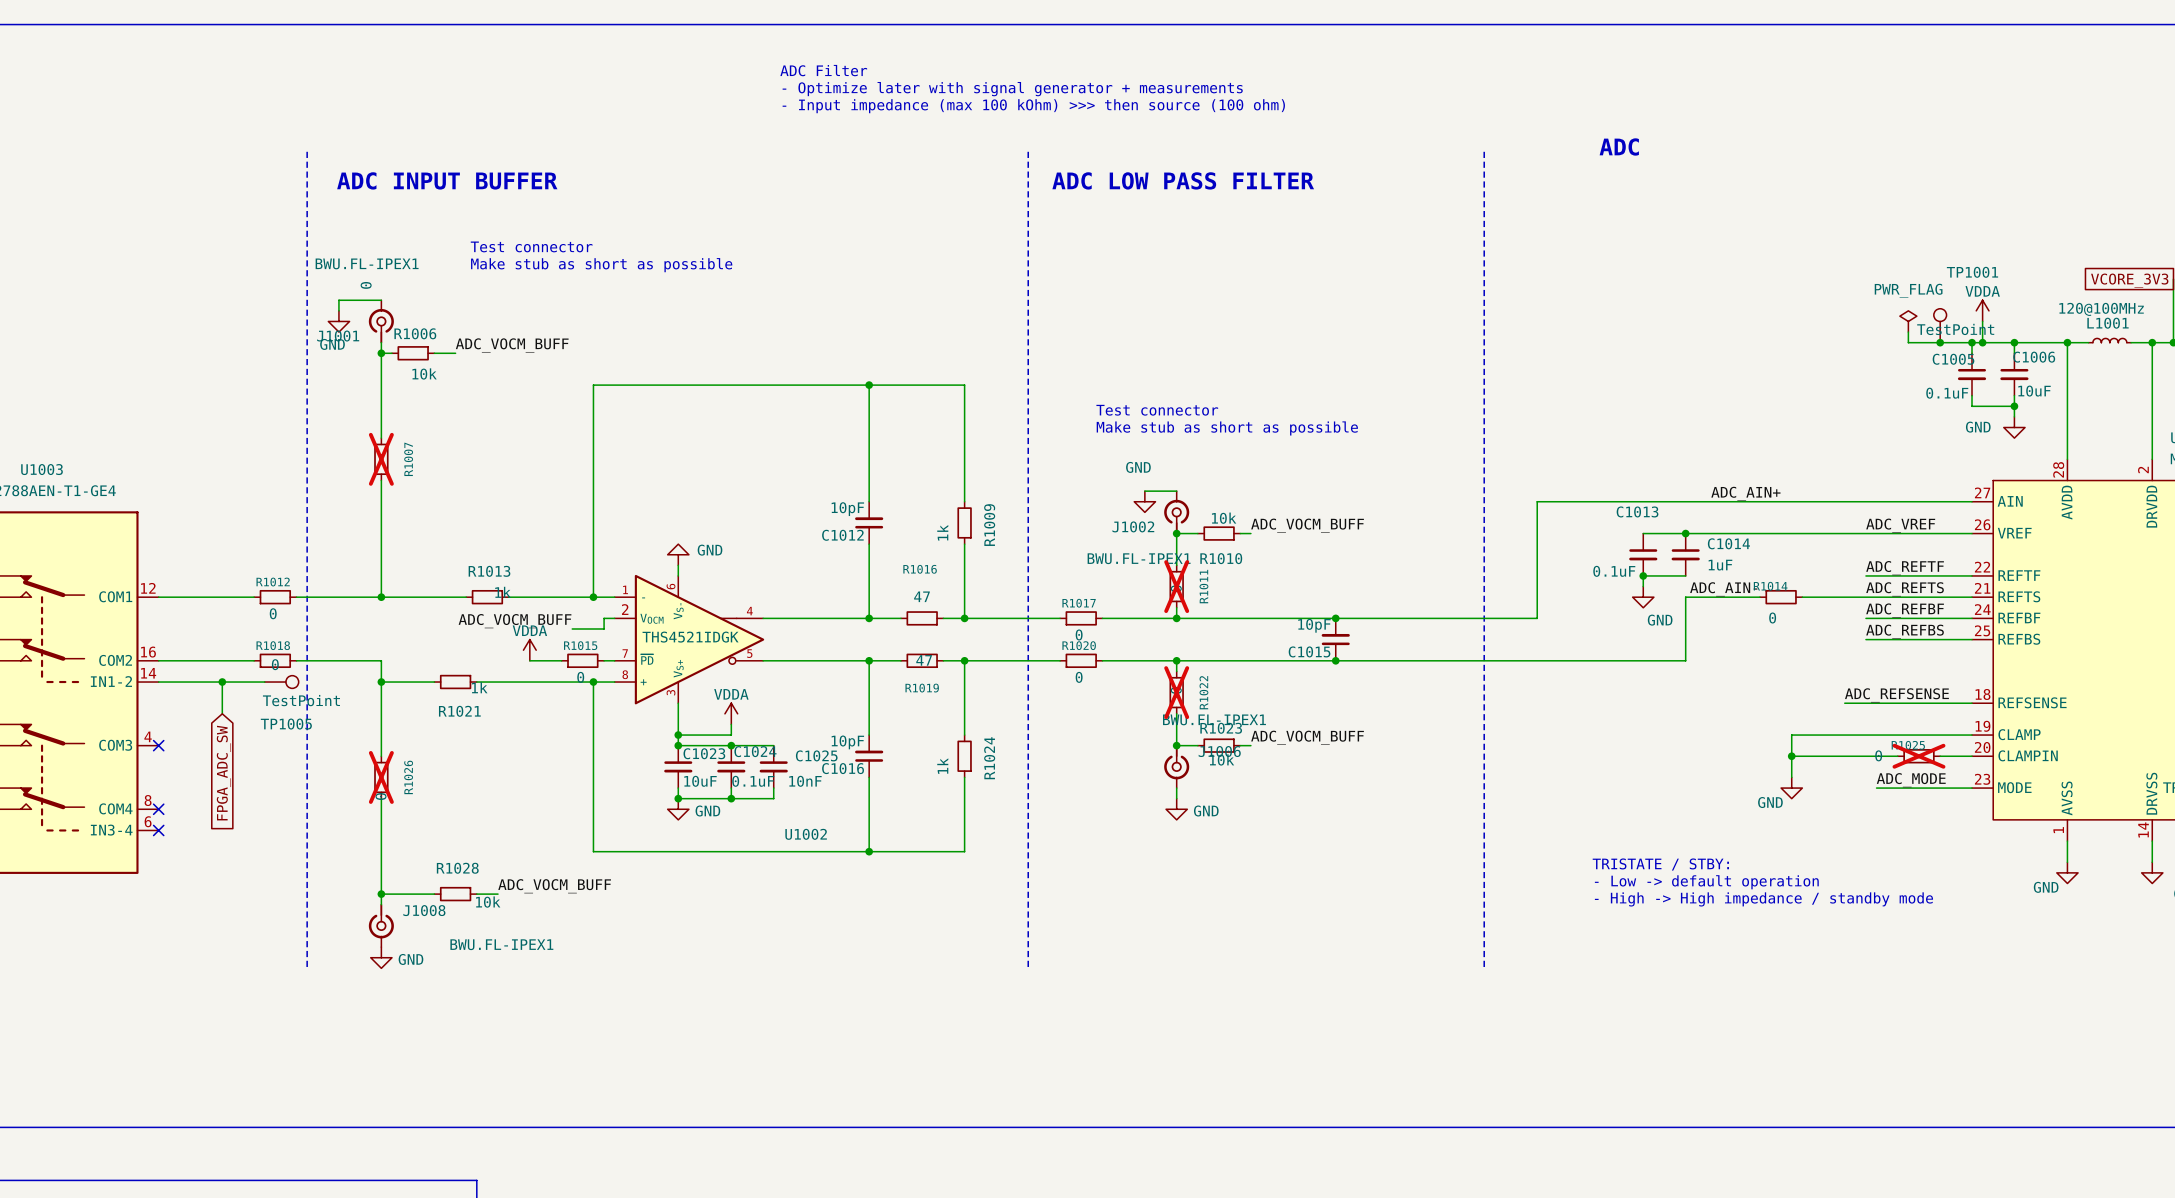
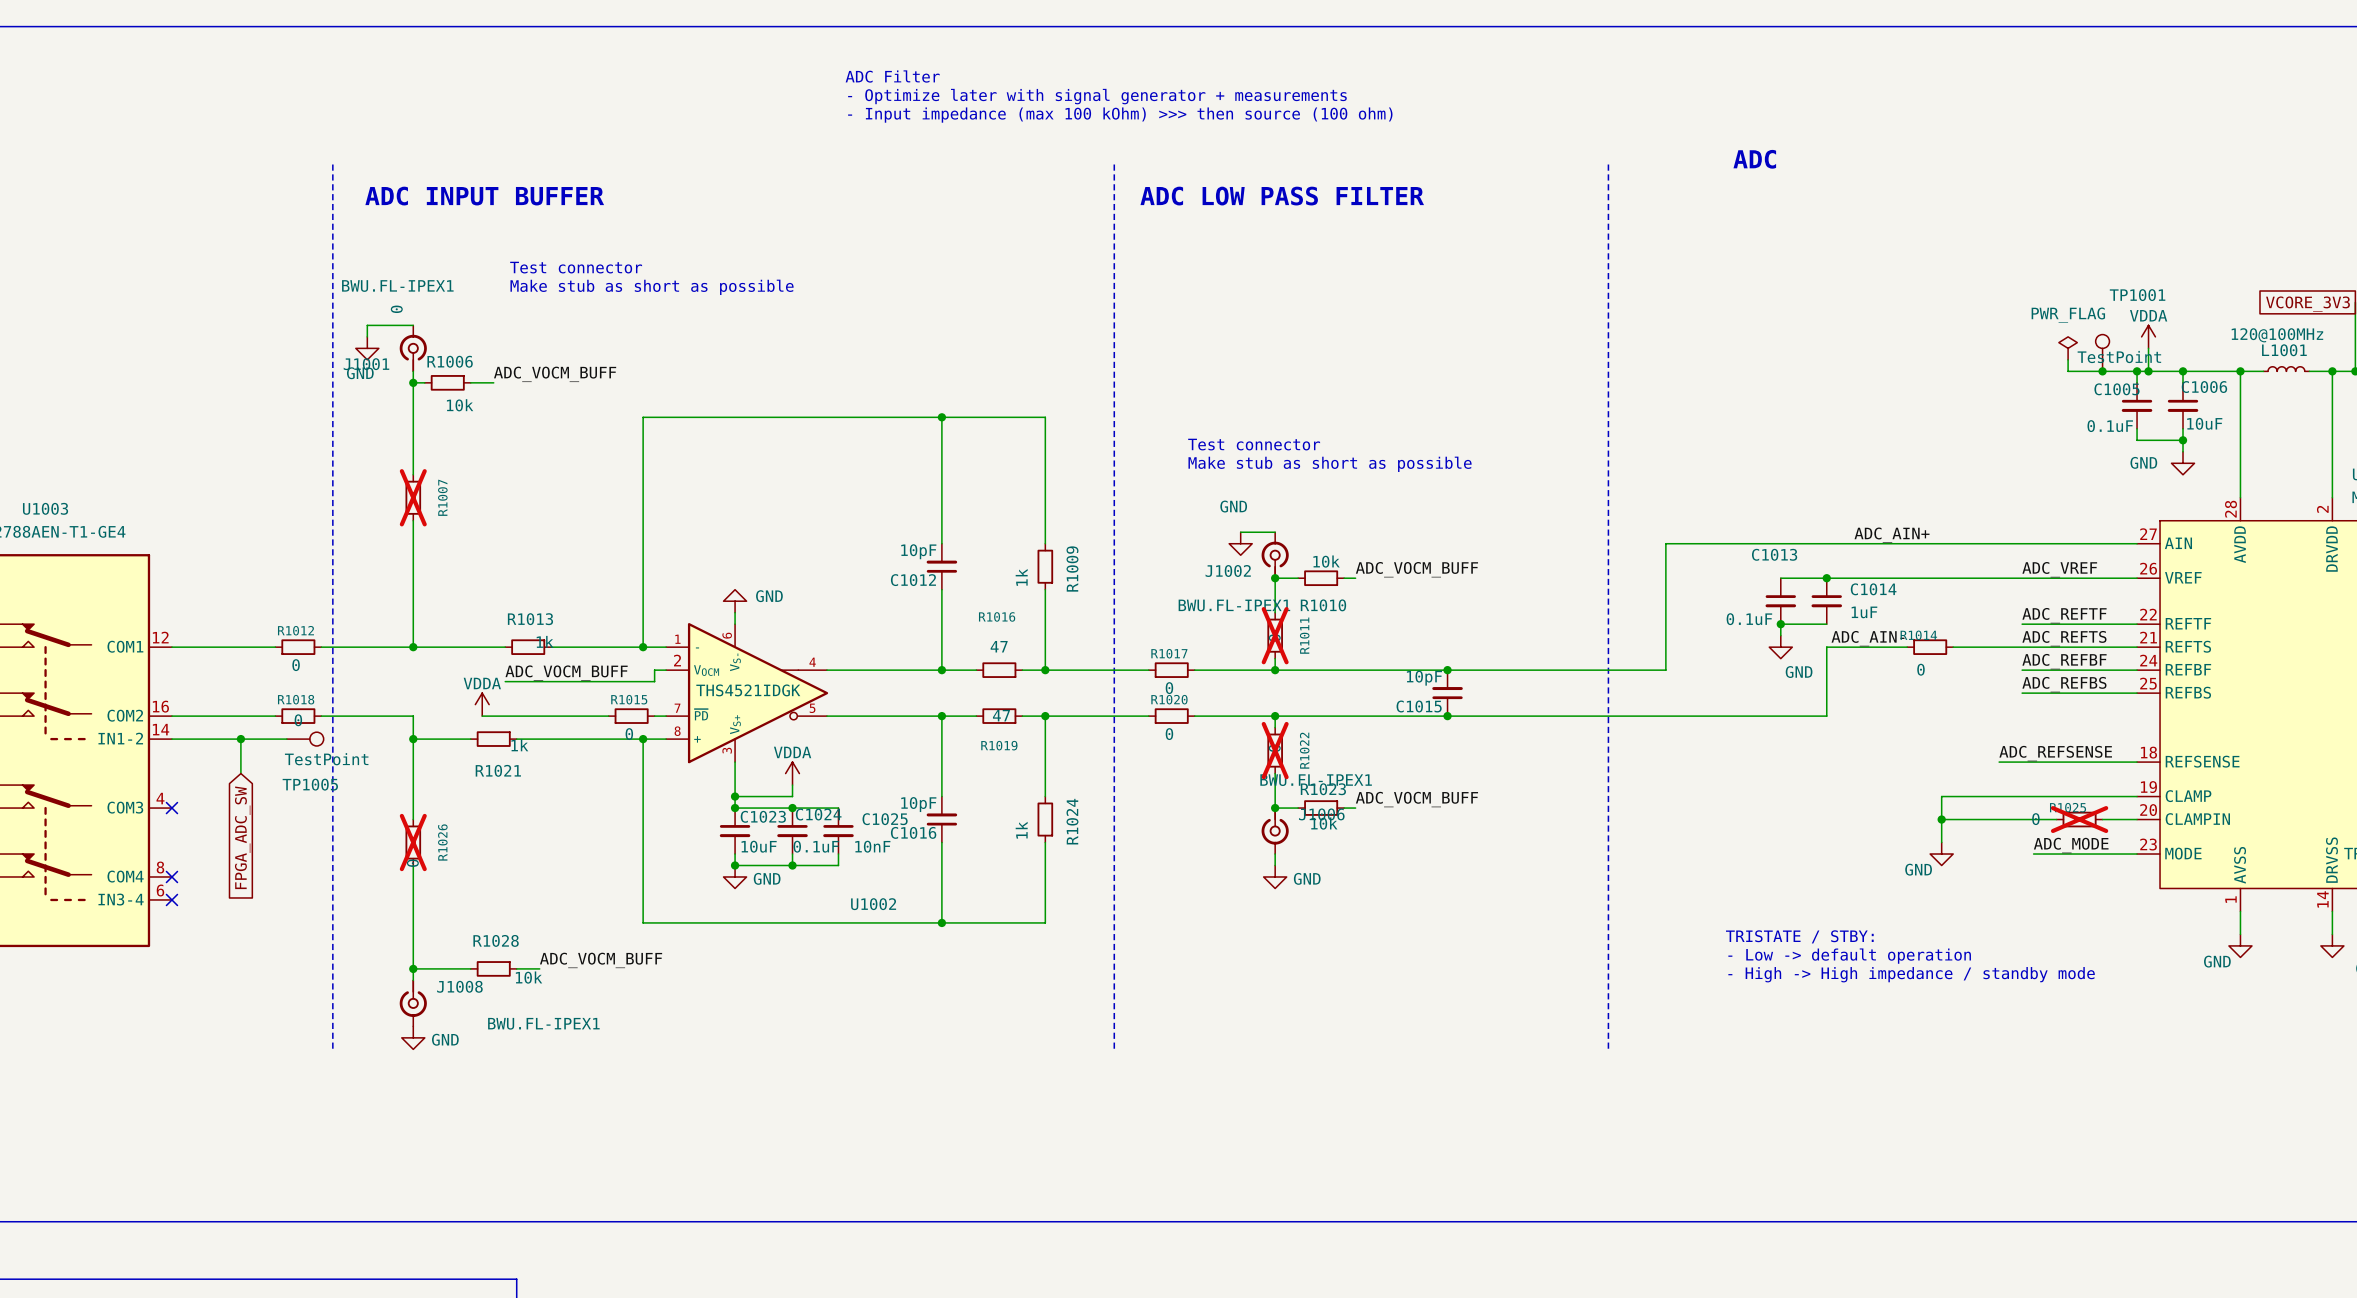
label position: ADC_VOCM_BUFF (515, 621) -> ADC_VOCM_BUFF (566, 673)
wire: none -> (505, 681) (620, 681)
power symbol position: VDDA (529, 650) -> VDDA (482, 704)
wire: none -> (482, 716) (574, 716)

